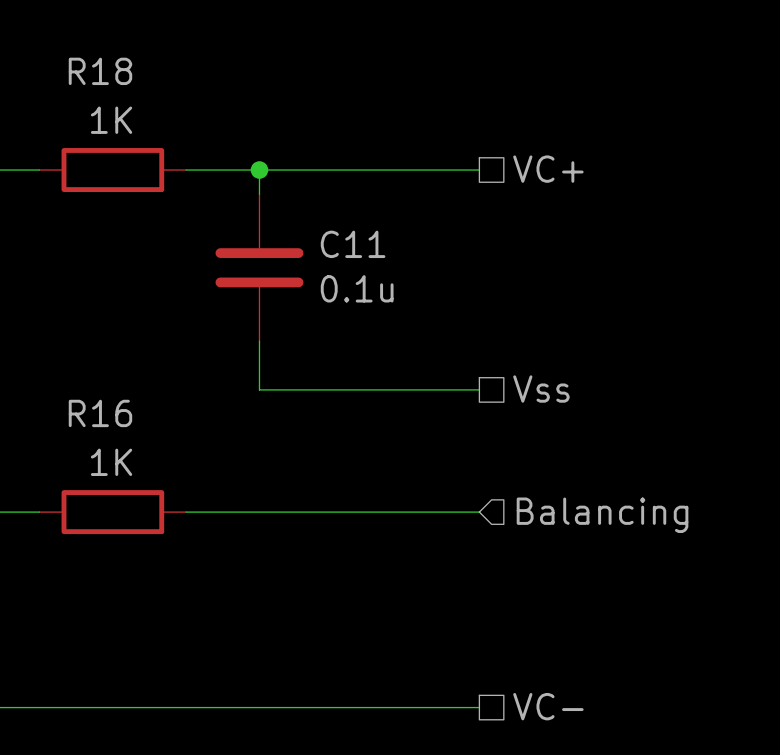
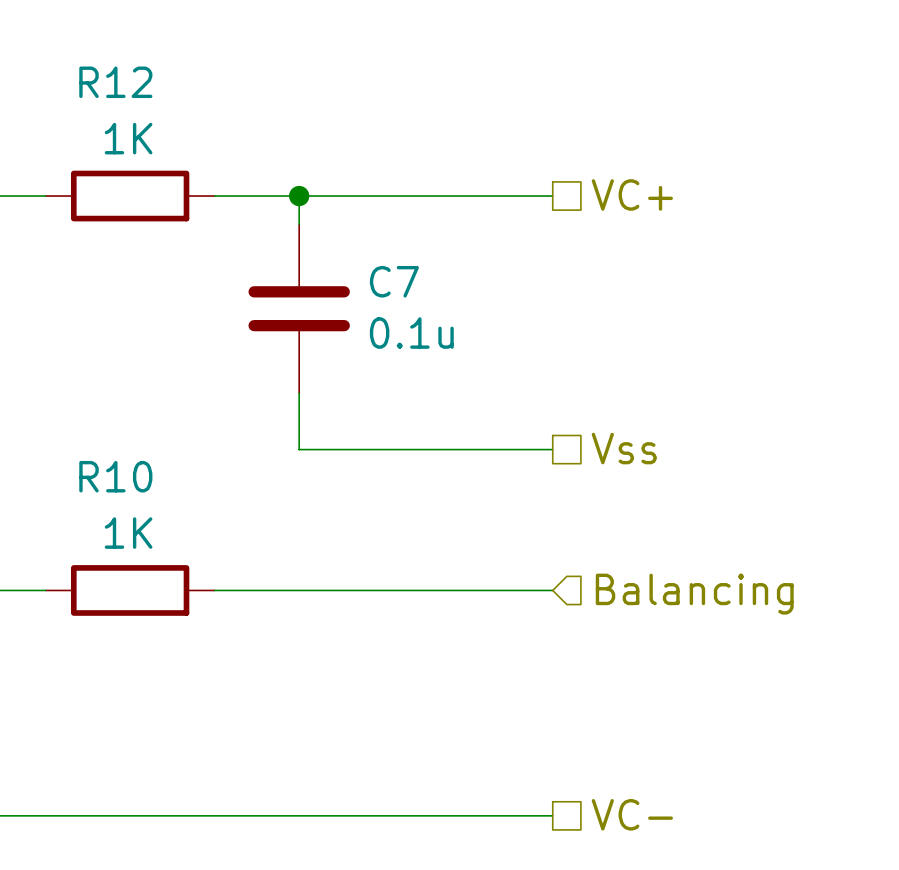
R18 name: R18 (100, 71) -> R12 (115, 82)
C11 name: C11 (353, 244) -> C7 (394, 281)
R16 name: R16 (100, 413) -> R10 (115, 476)

